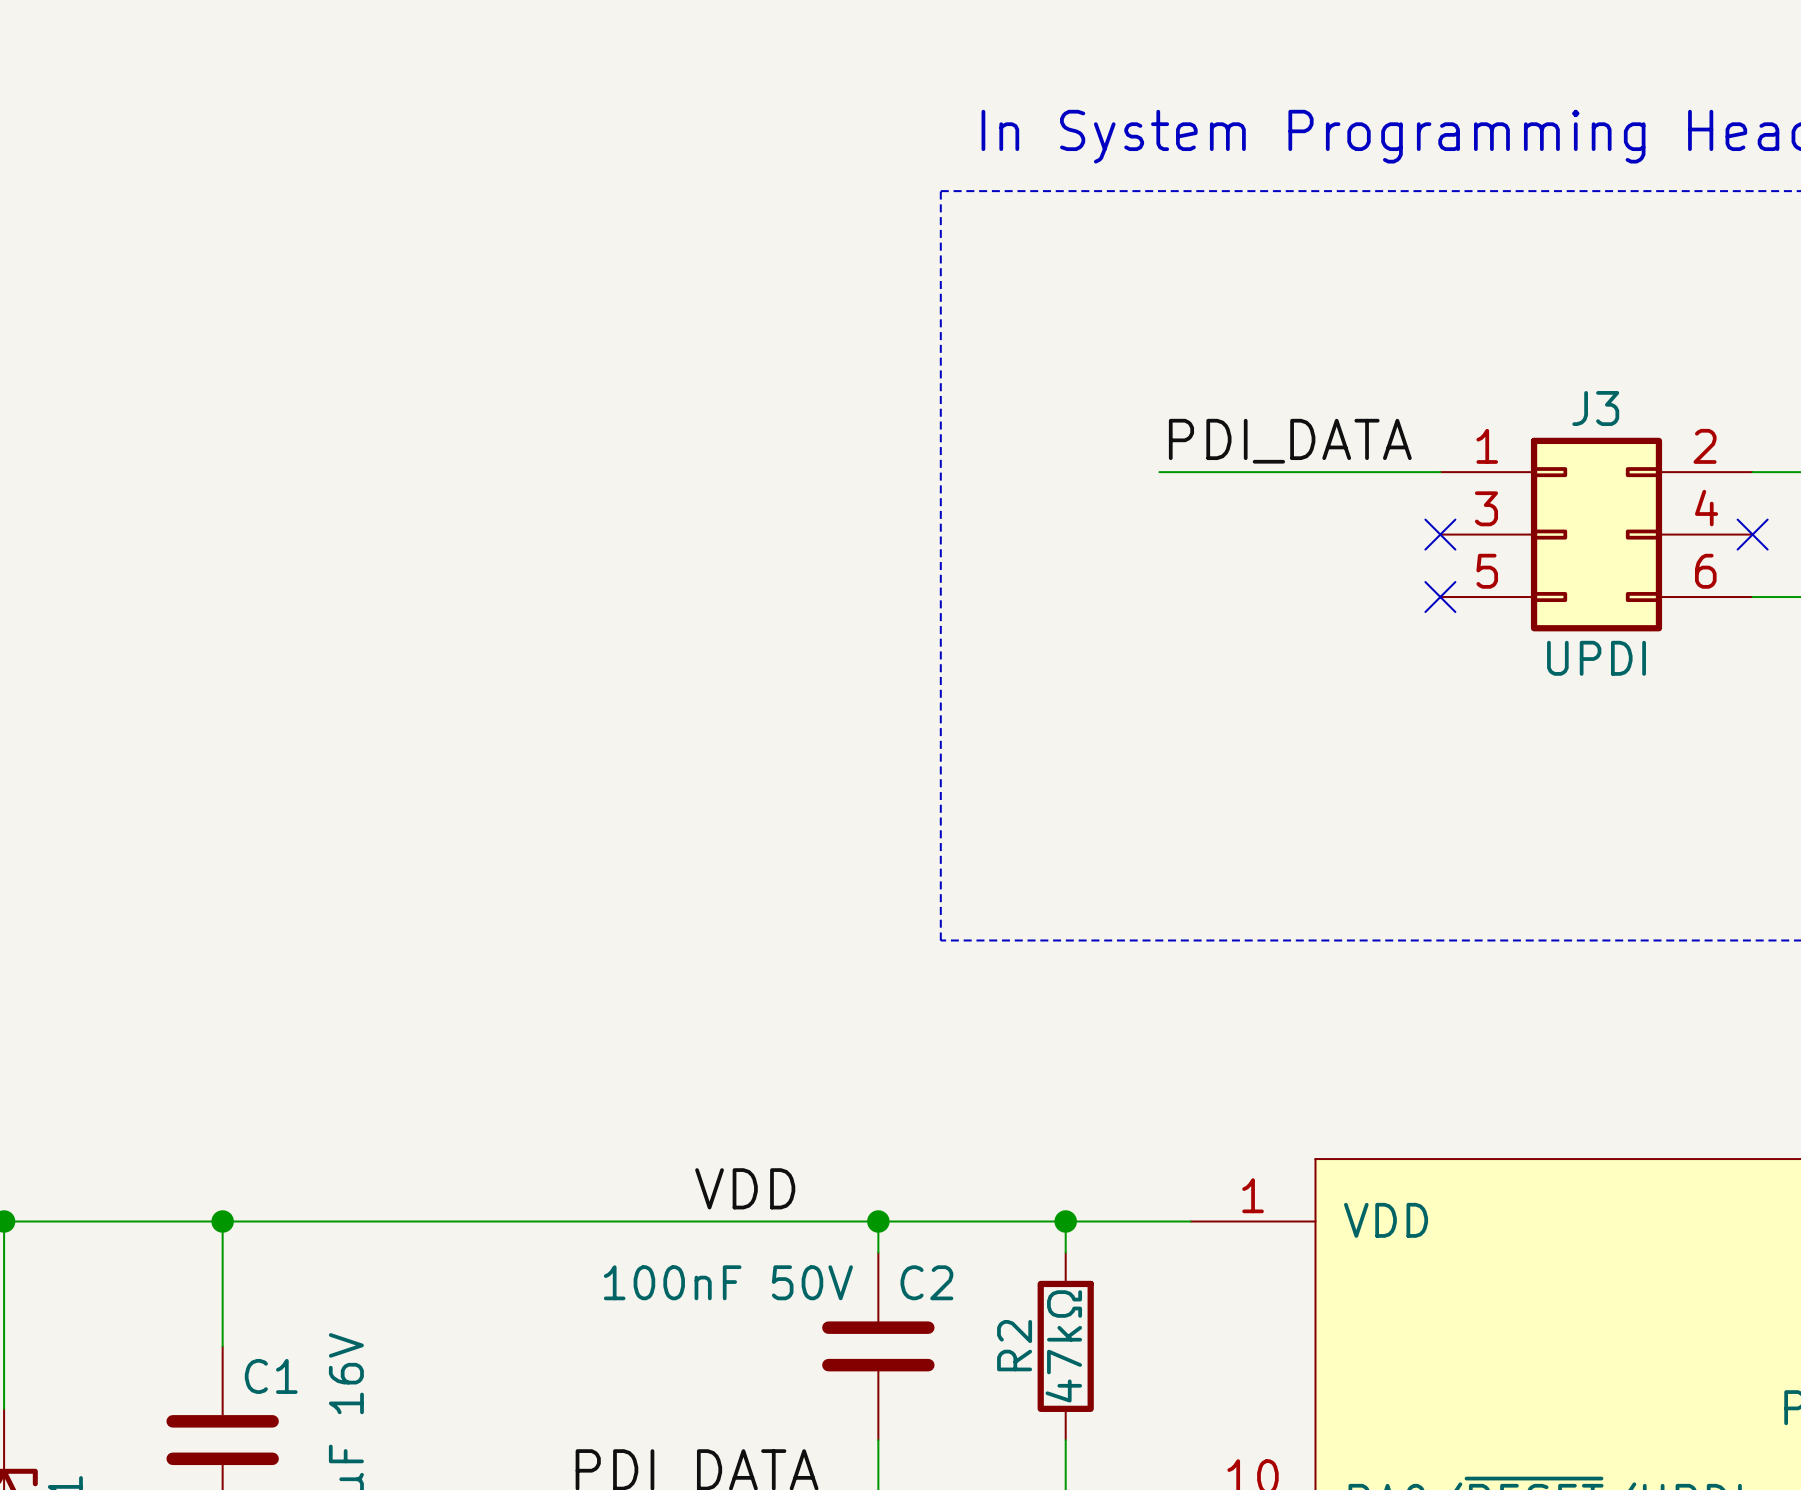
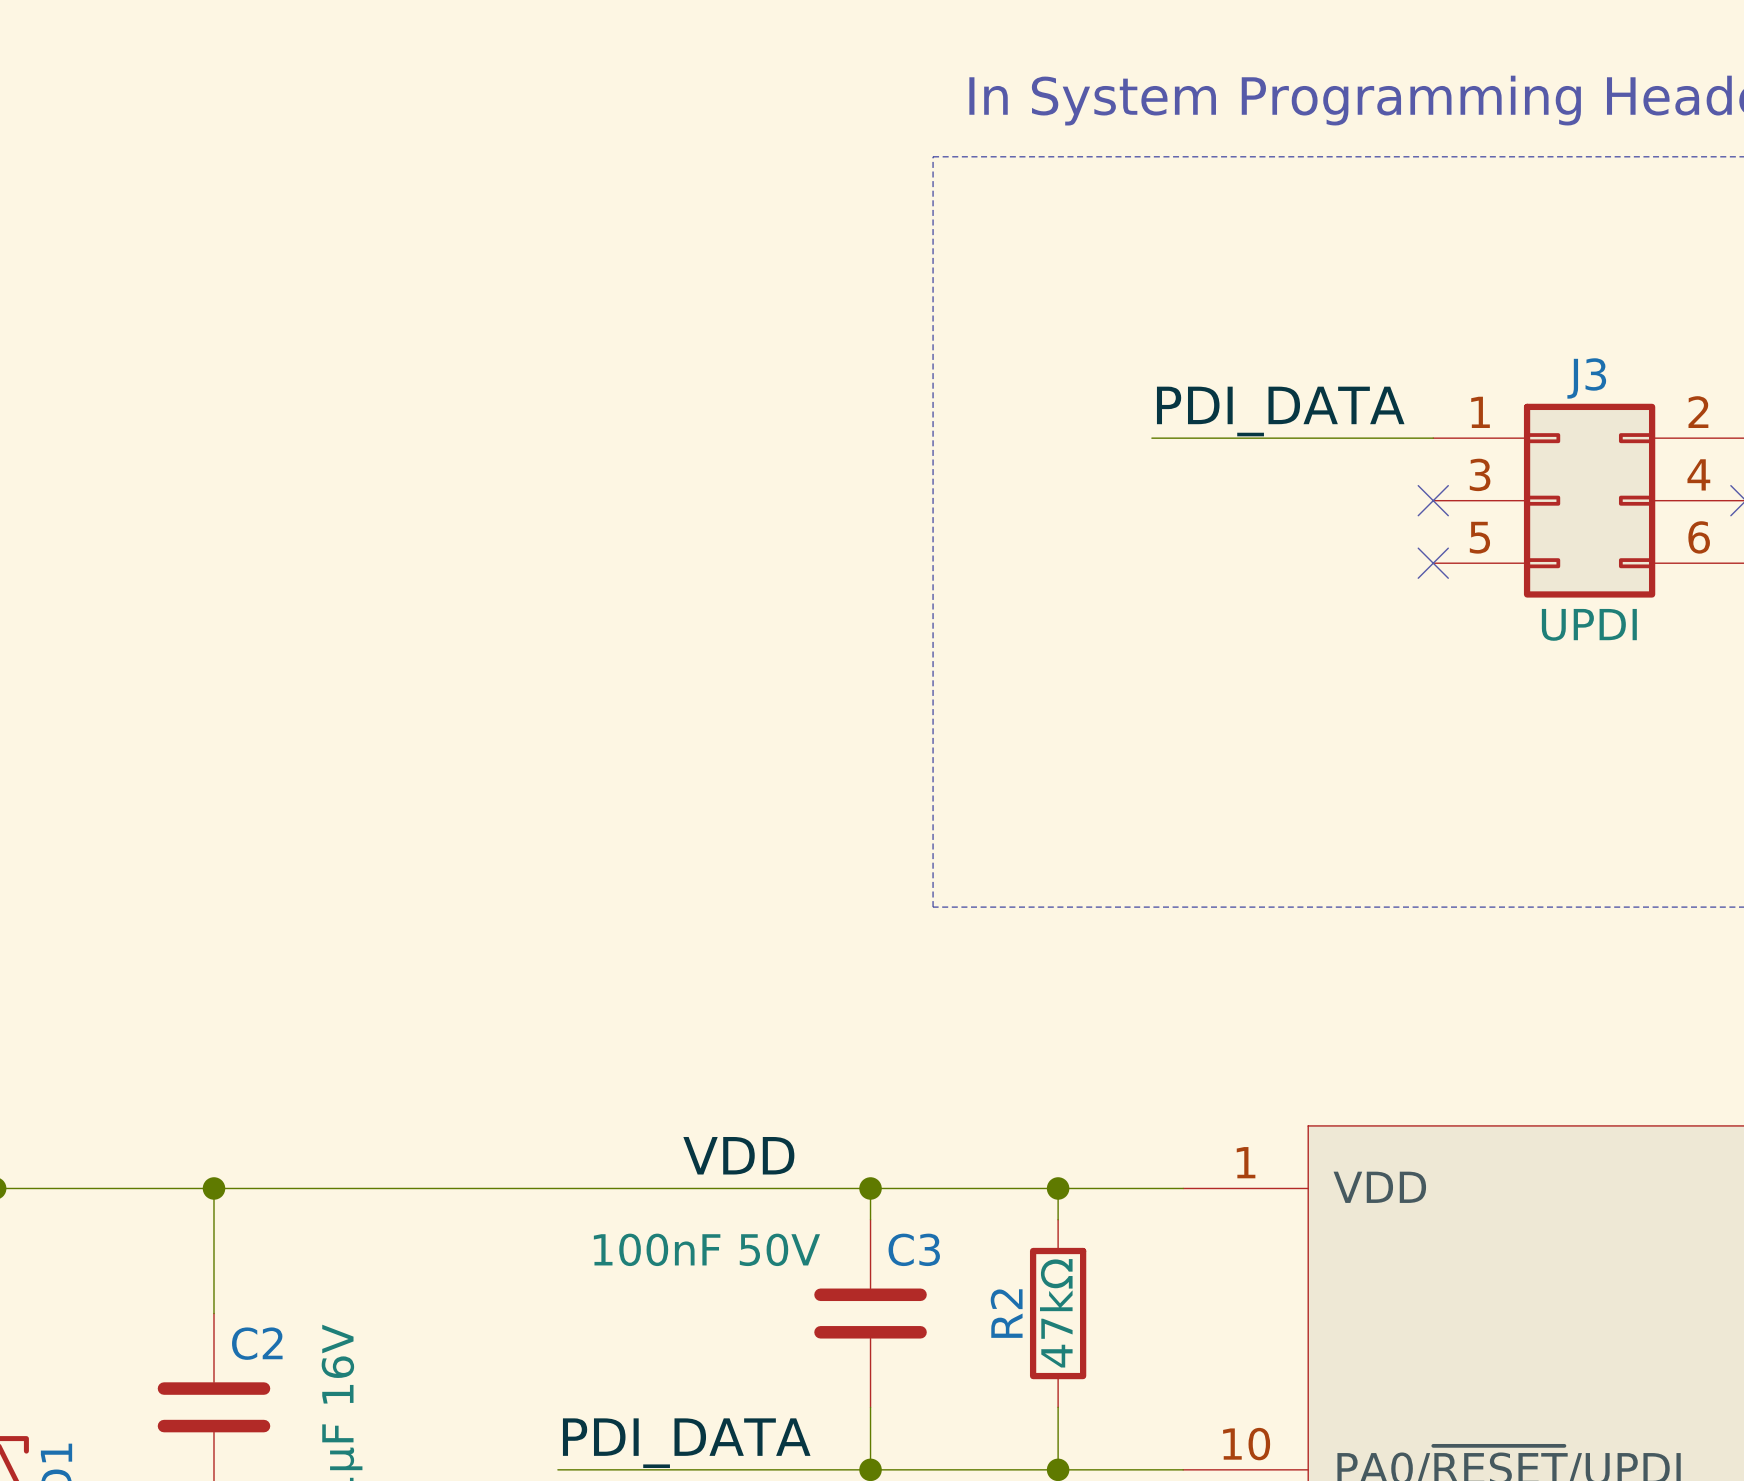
C2 name: C2 (926, 1282) -> C3 (914, 1249)
C1 name: C1 (271, 1376) -> C2 (257, 1343)

